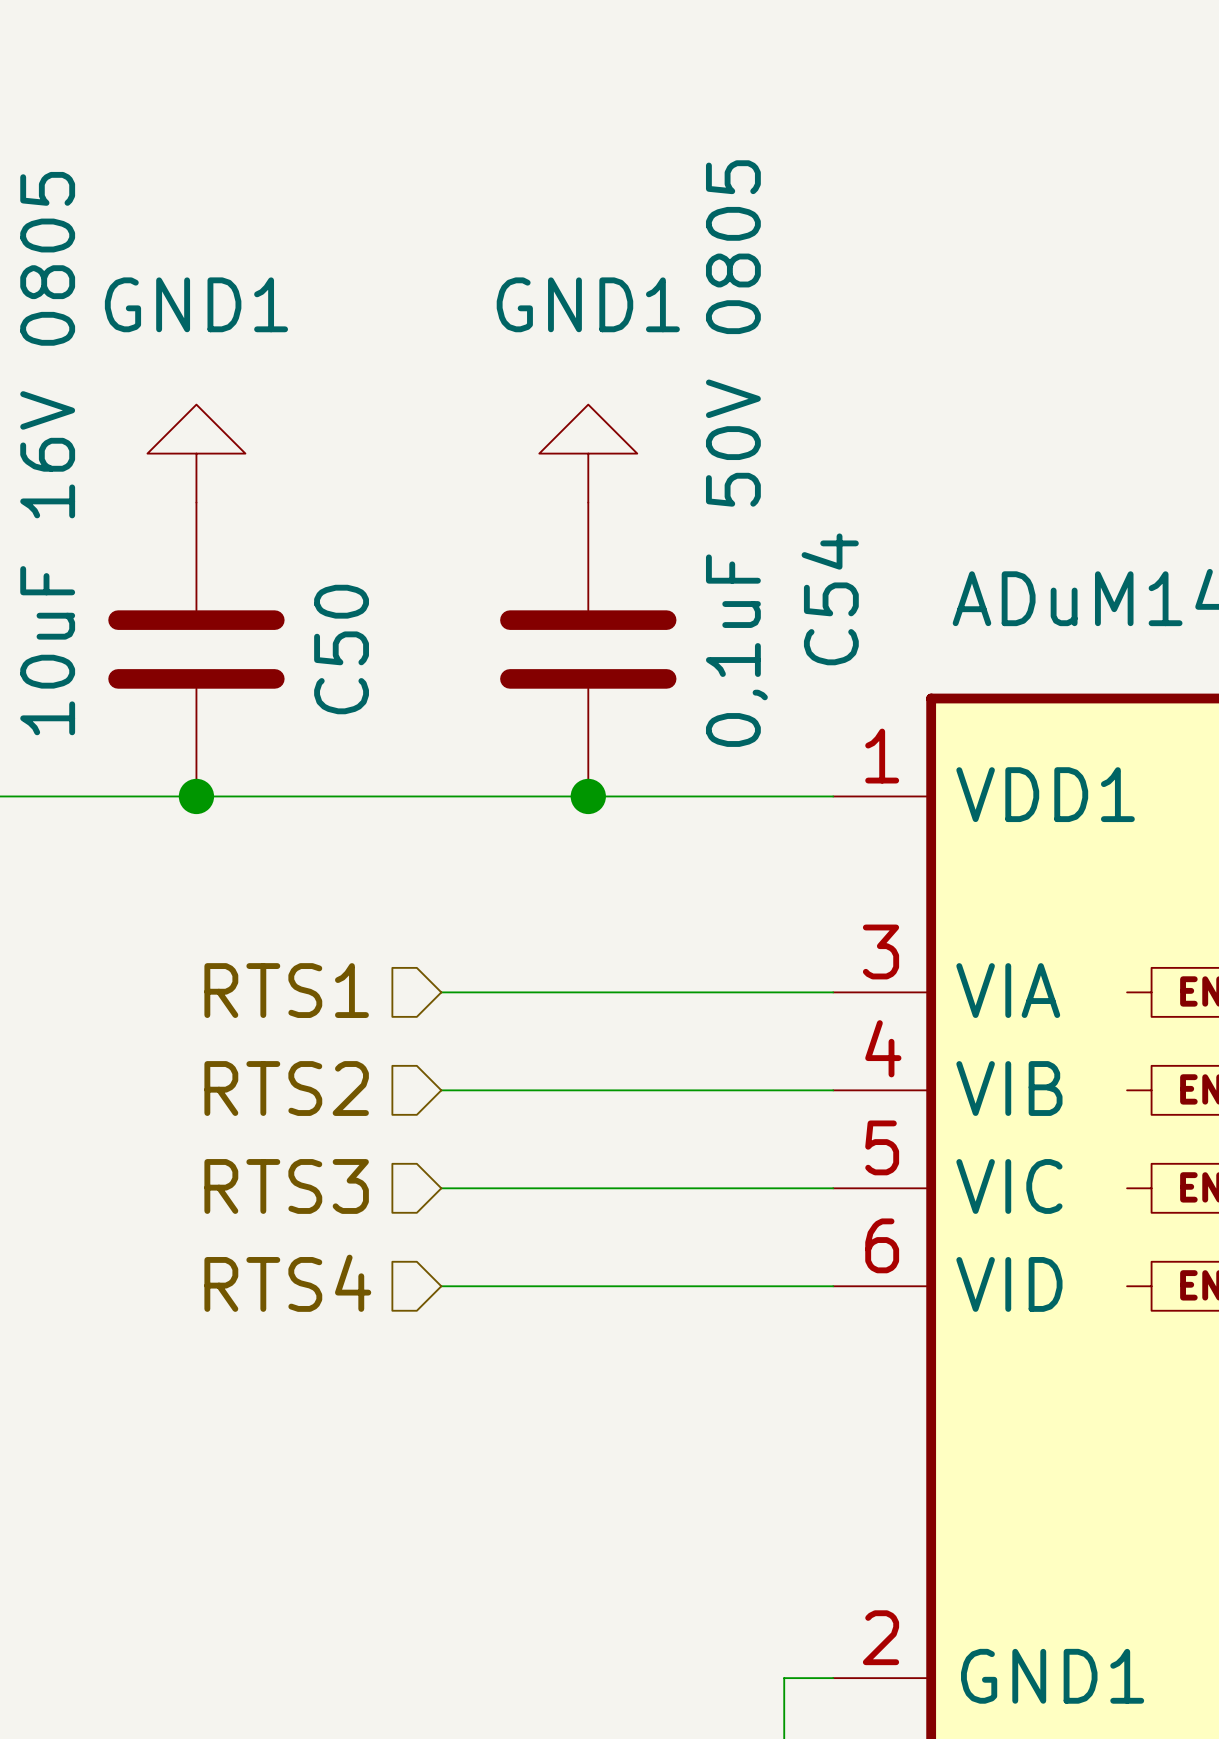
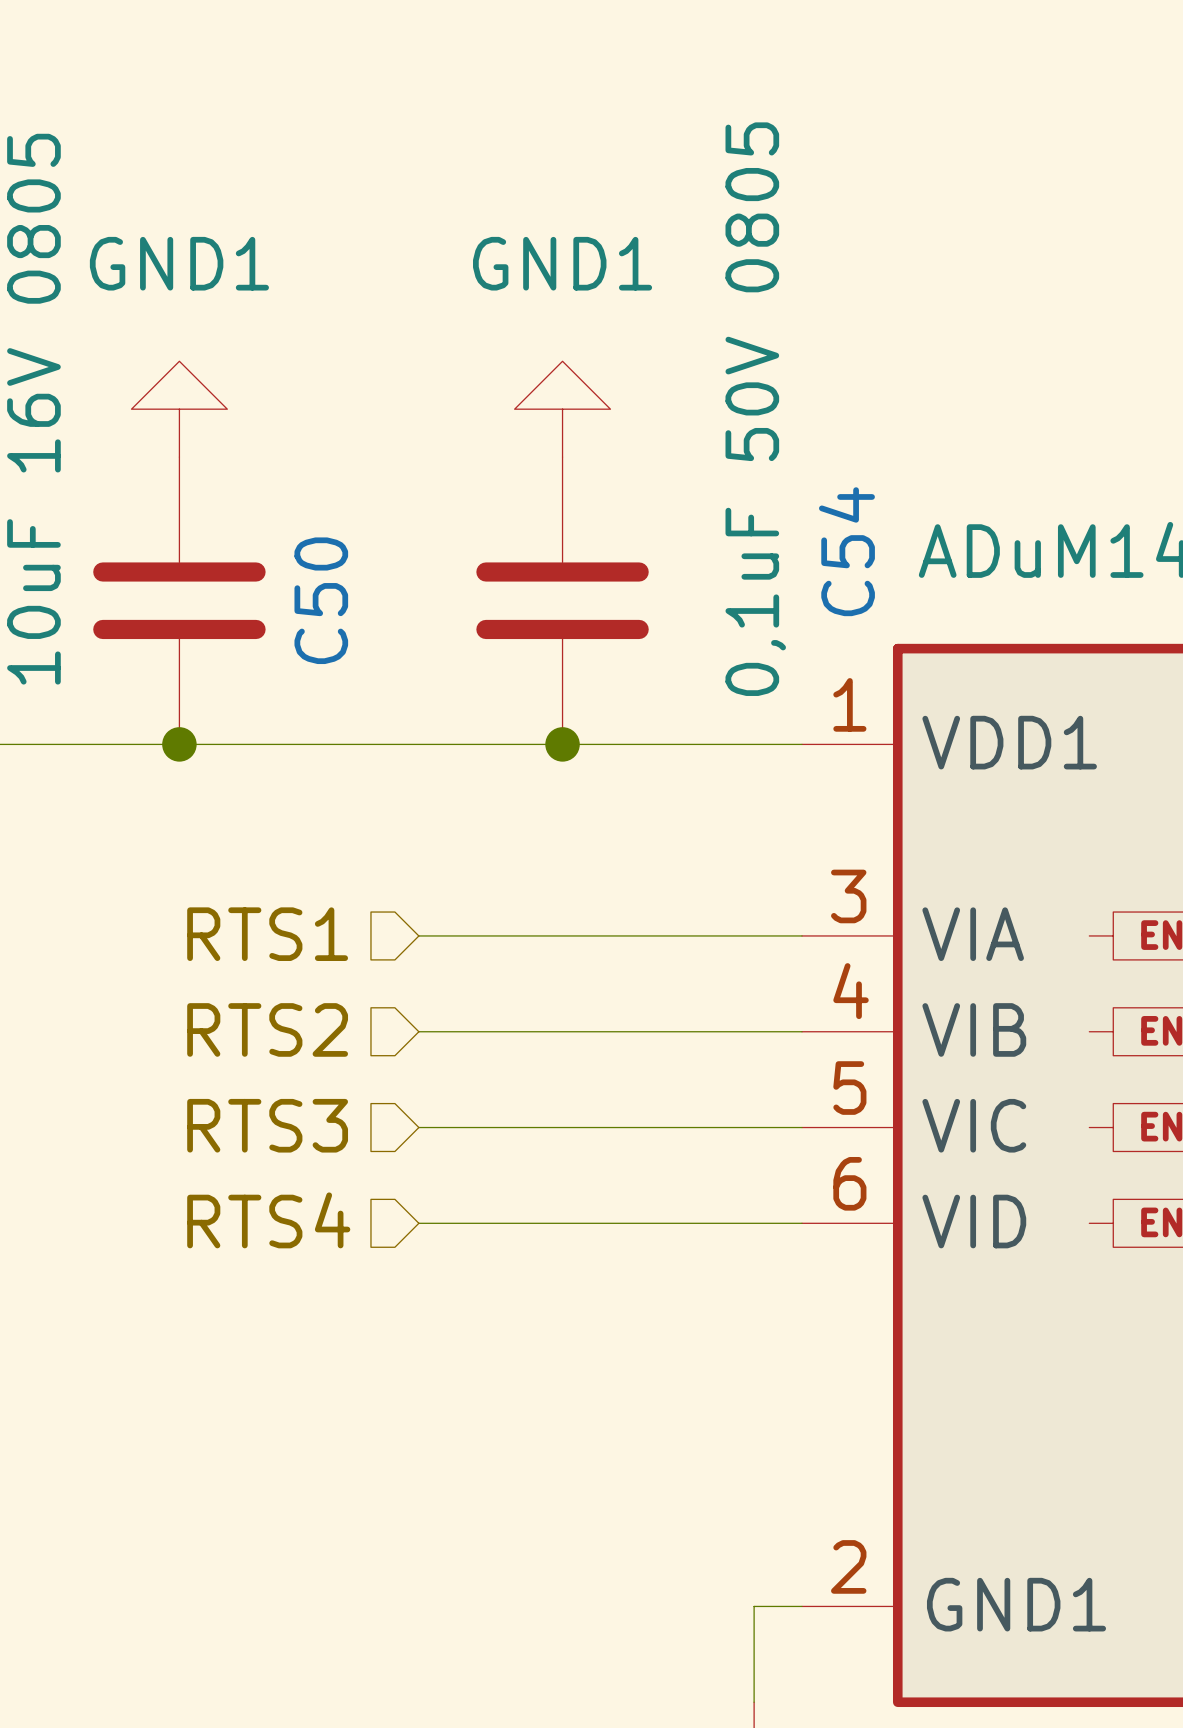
C54 value position: 0,1uF 50V 0805 (736, 453) -> 0,1uF 50V 0805 (755, 409)
C54 name position: C54 (830, 599) -> C54 (846, 551)

